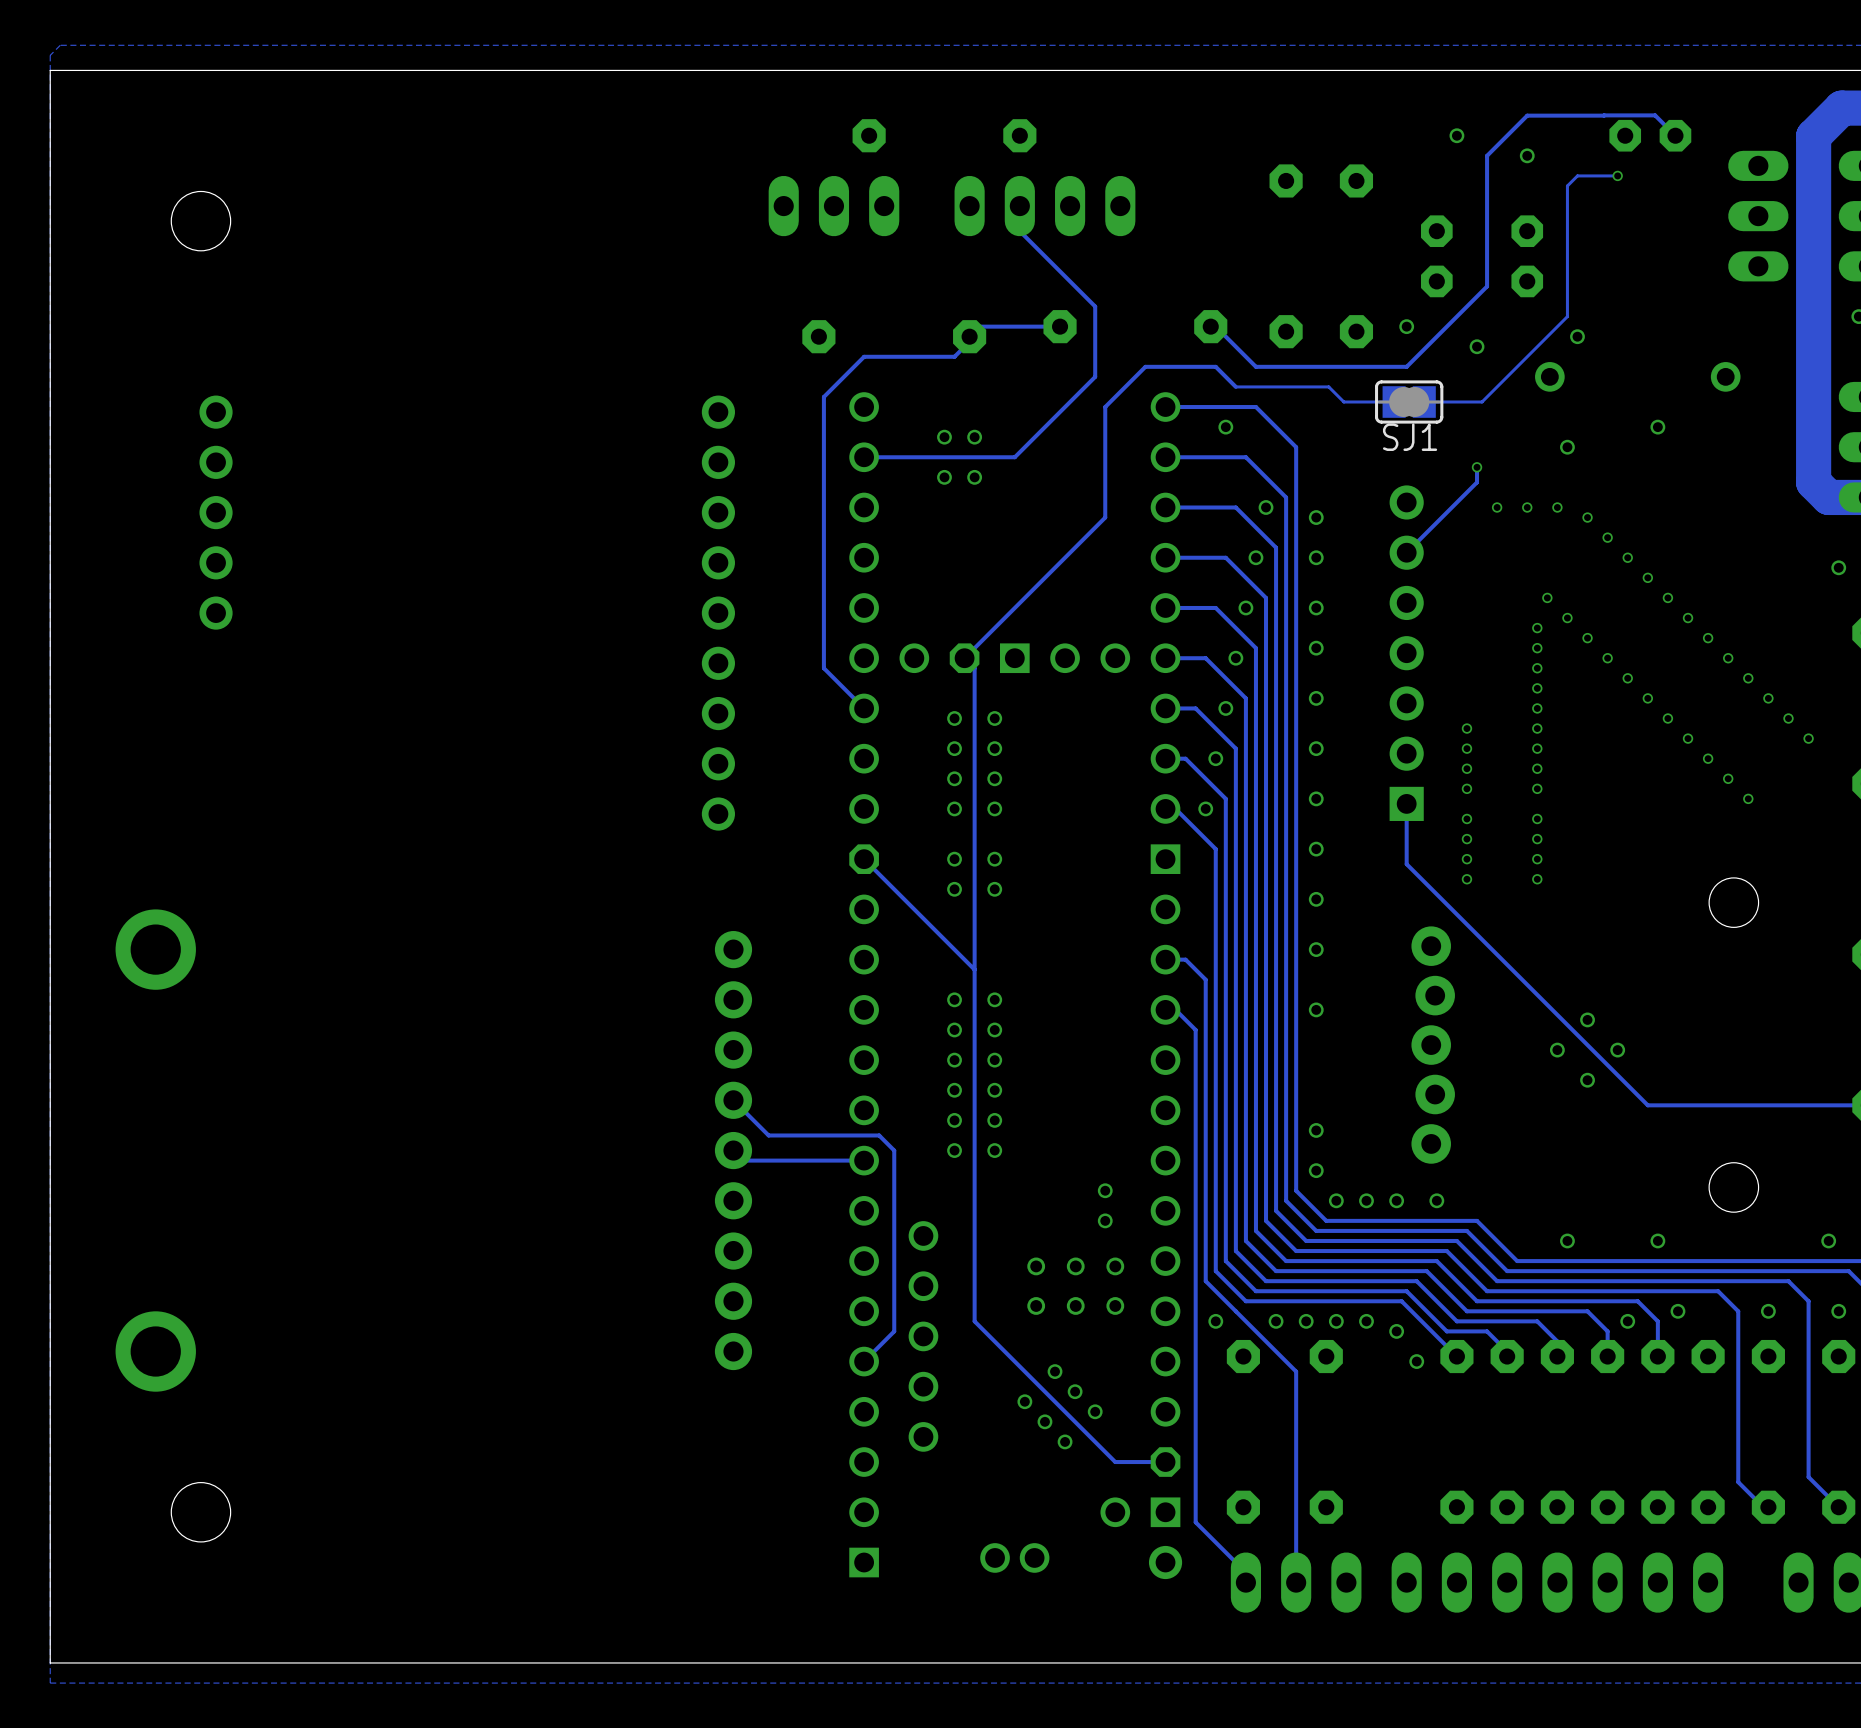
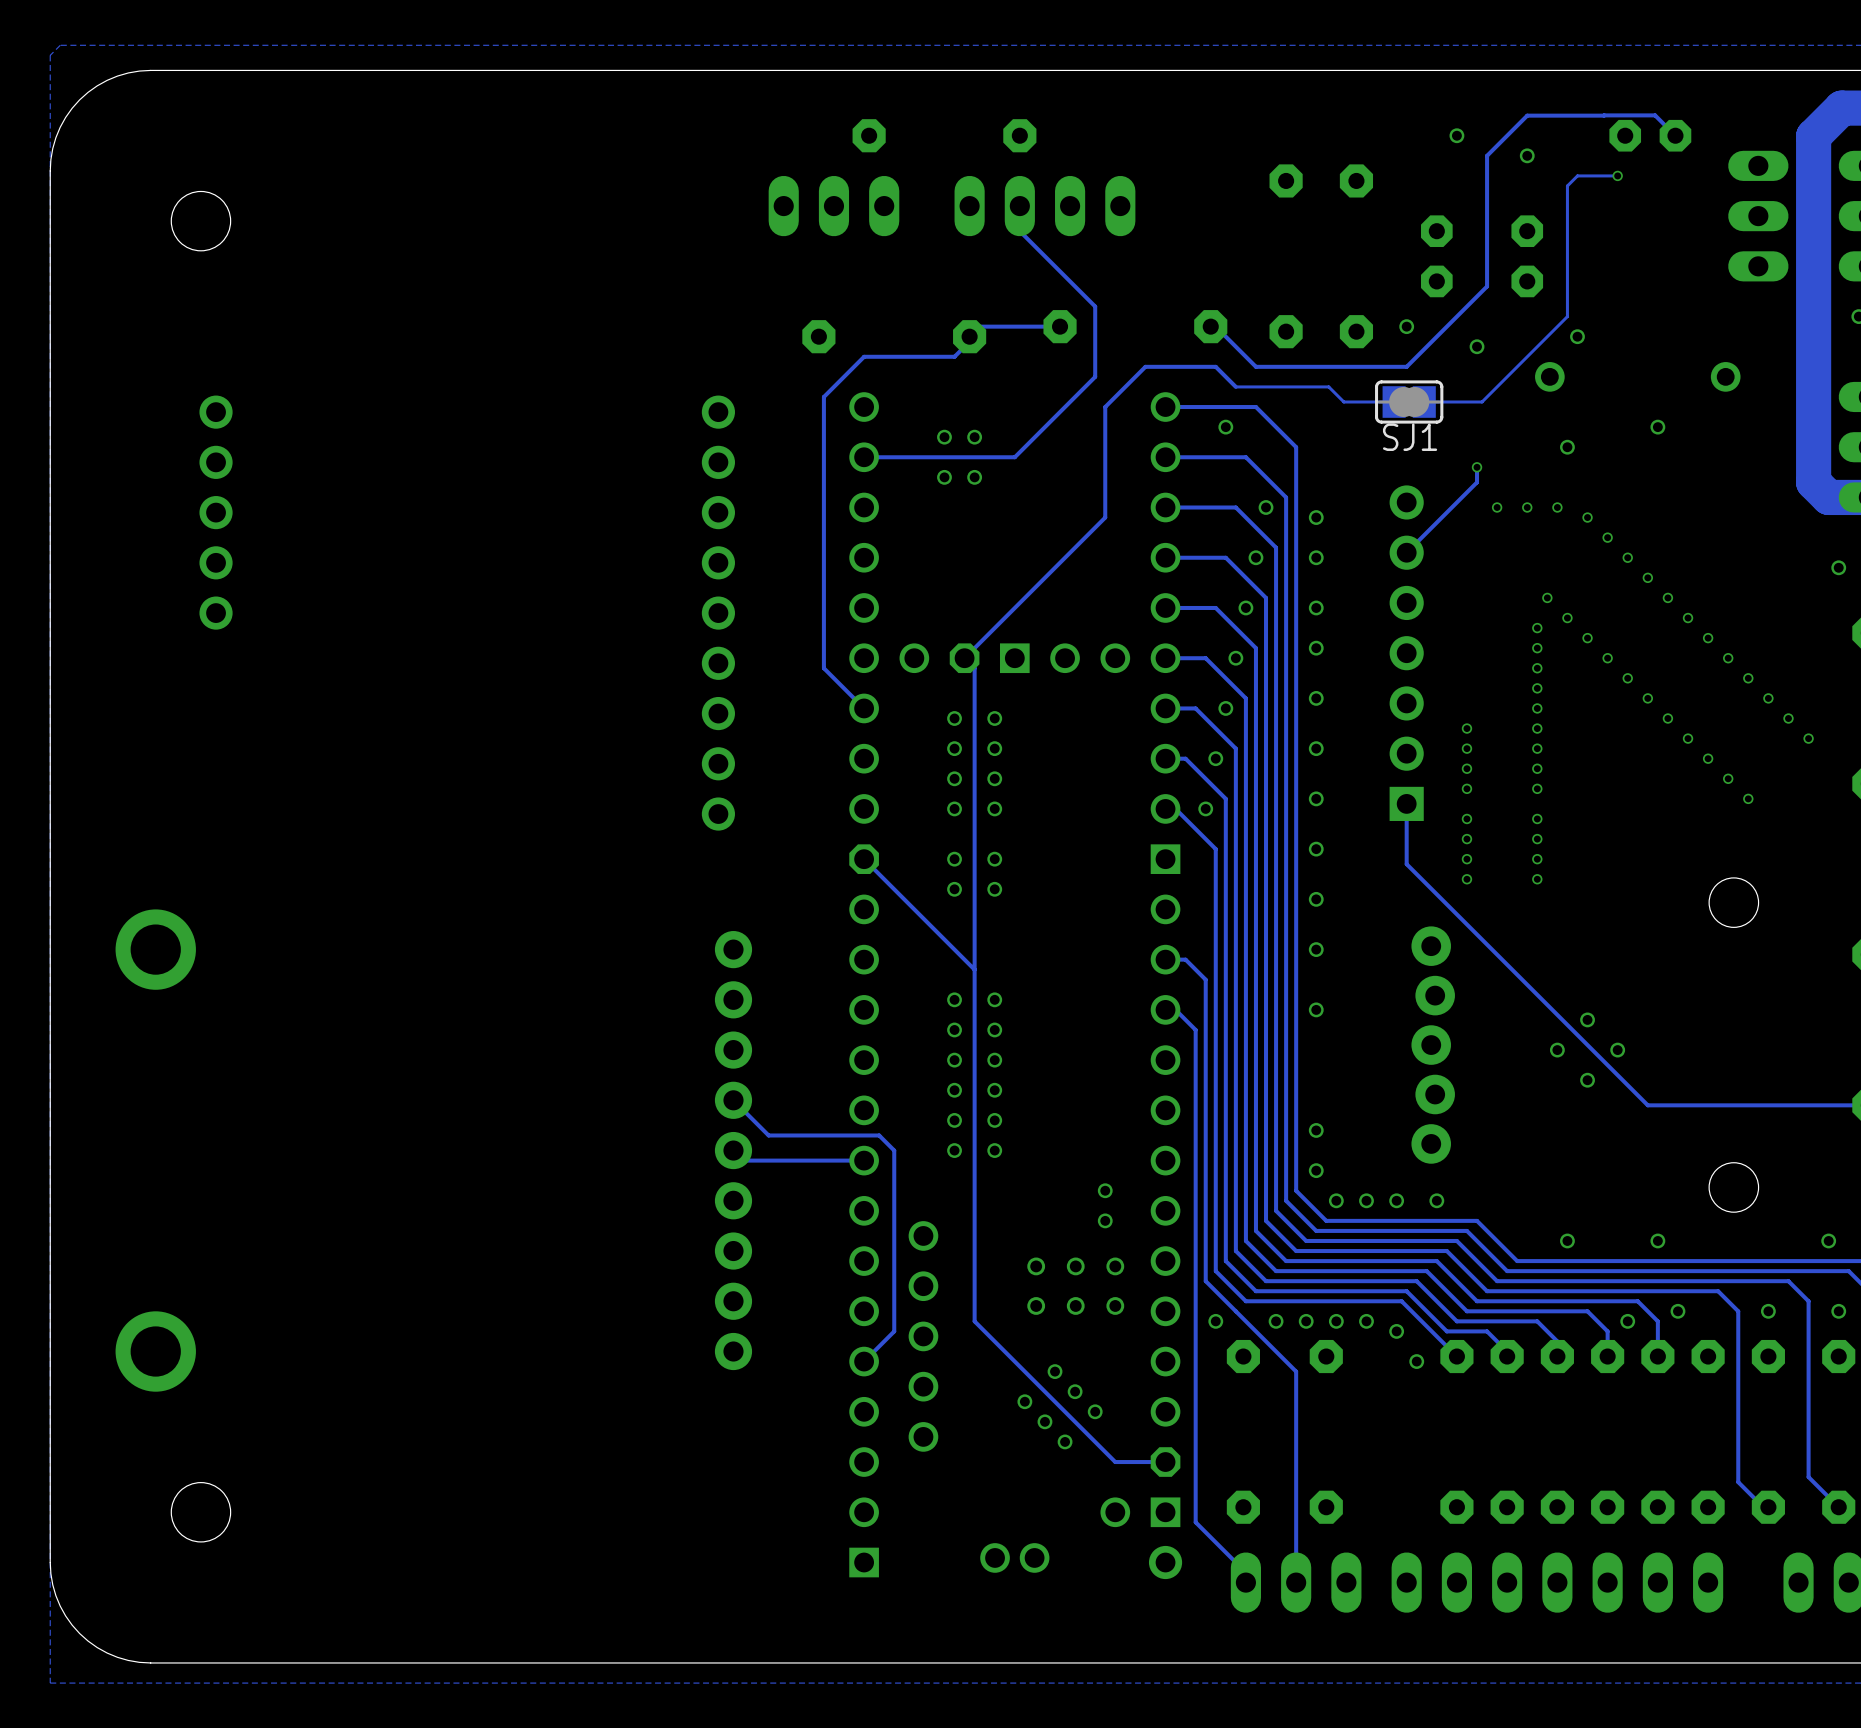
board edge: (150, 70) (50, 70) (50, 170) -> (150, 70) (128, 72) (107, 80) (79, 99) (60, 127) (52, 148) (50, 170)
board edge: (50, 1562) (50, 1662) (150, 1662) -> (50, 1562) (52, 1584) (60, 1606) (79, 1633) (107, 1653) (128, 1660) (150, 1662)

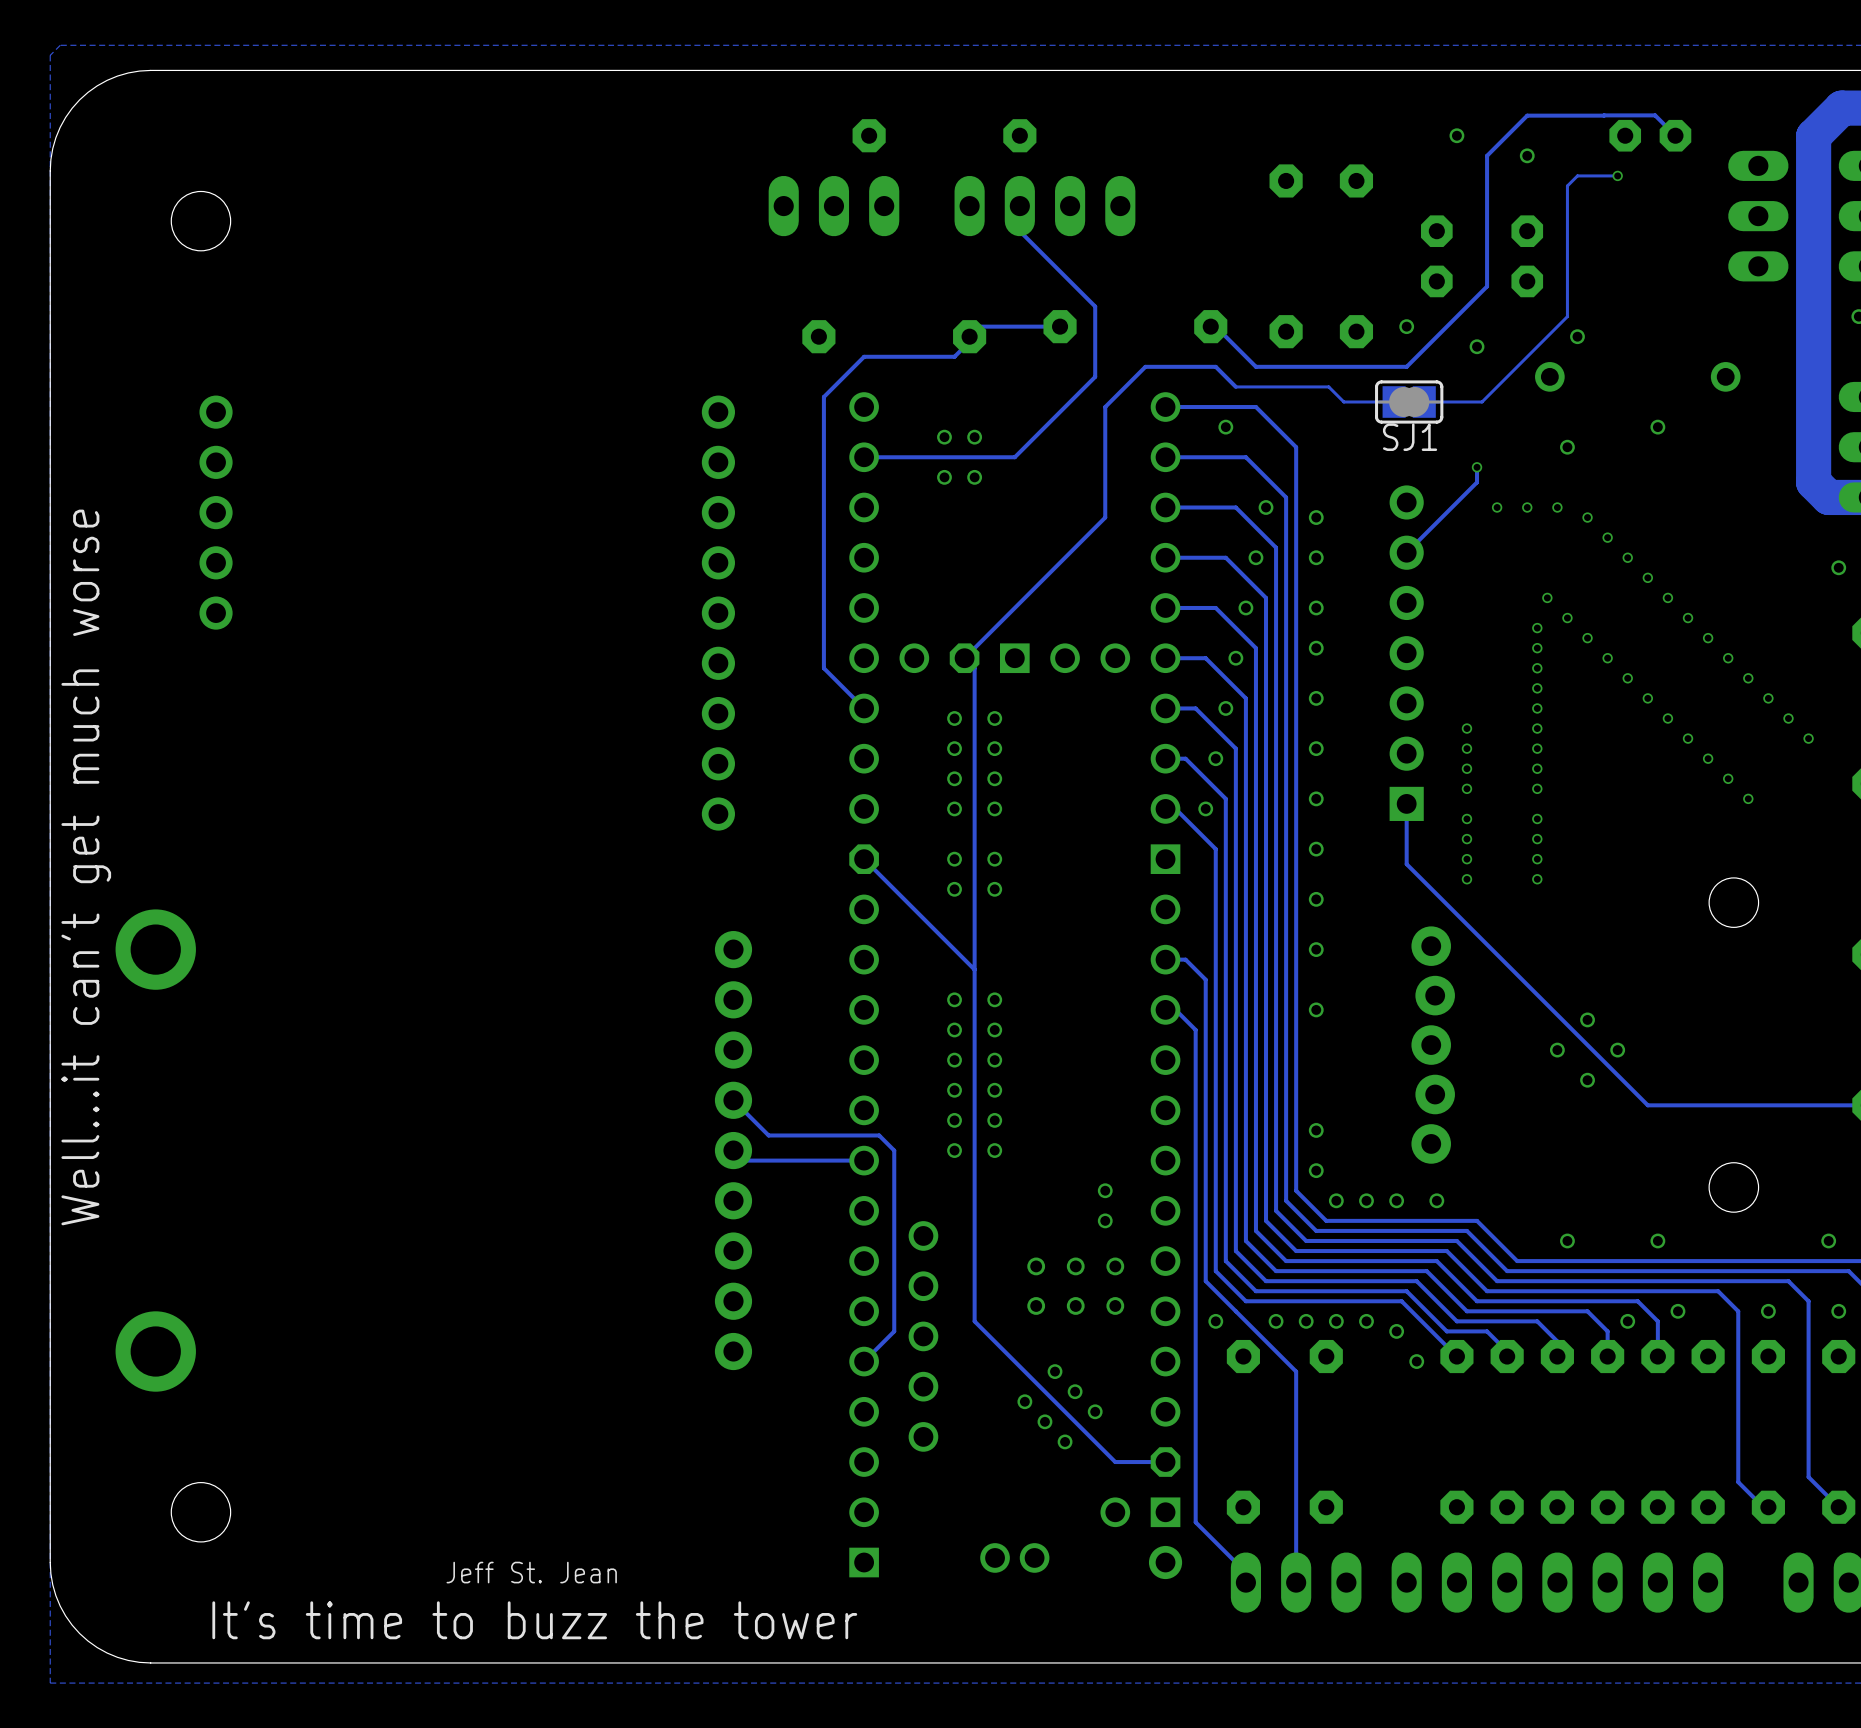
text: none -> Well...it can't get much worse (86, 867)
text: none -> Jeff St. Jean (531, 1572)
text: none -> It's time to buzz the tower (534, 1620)

